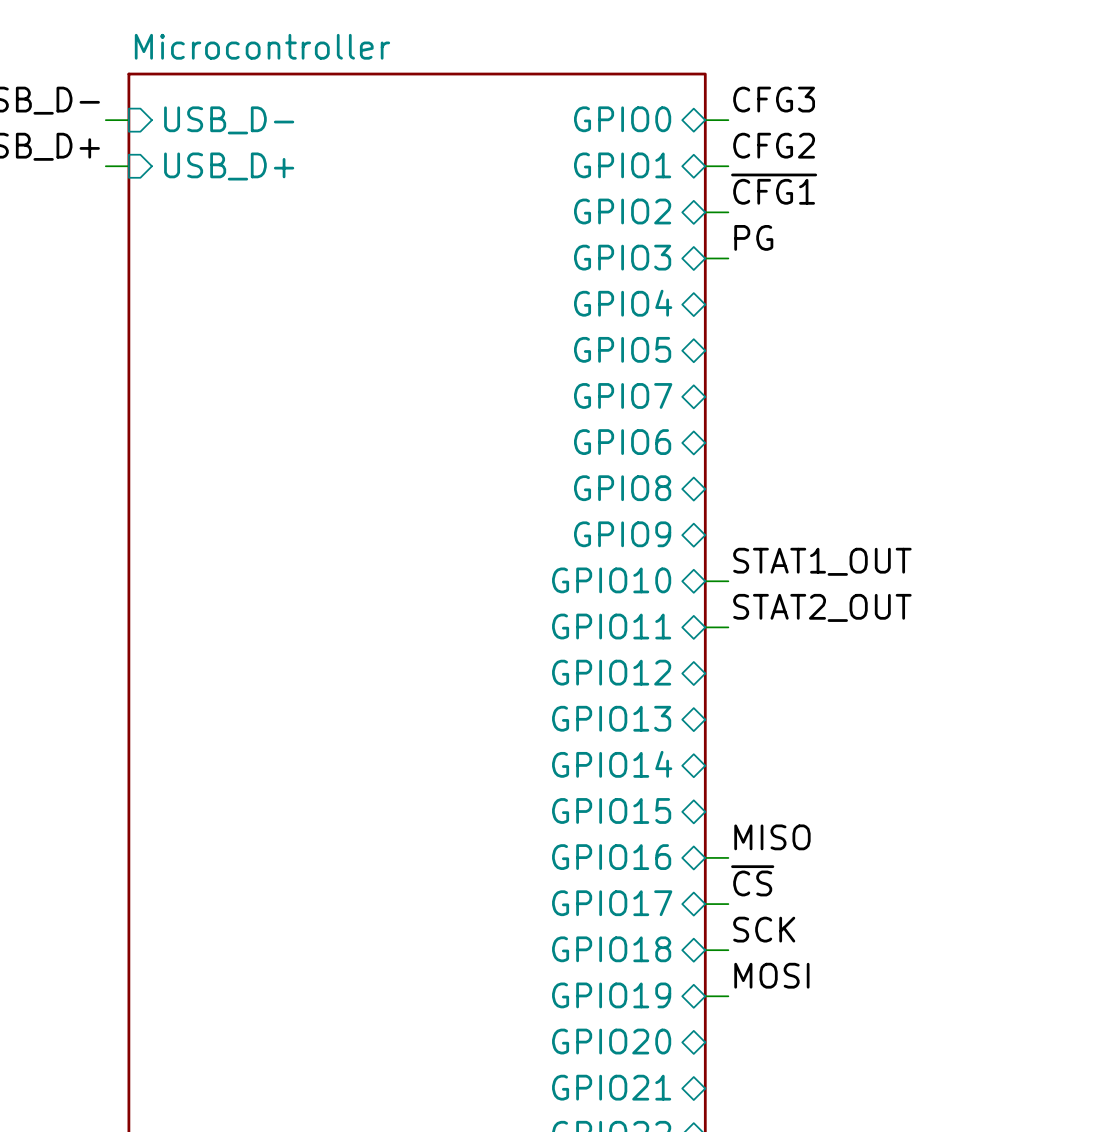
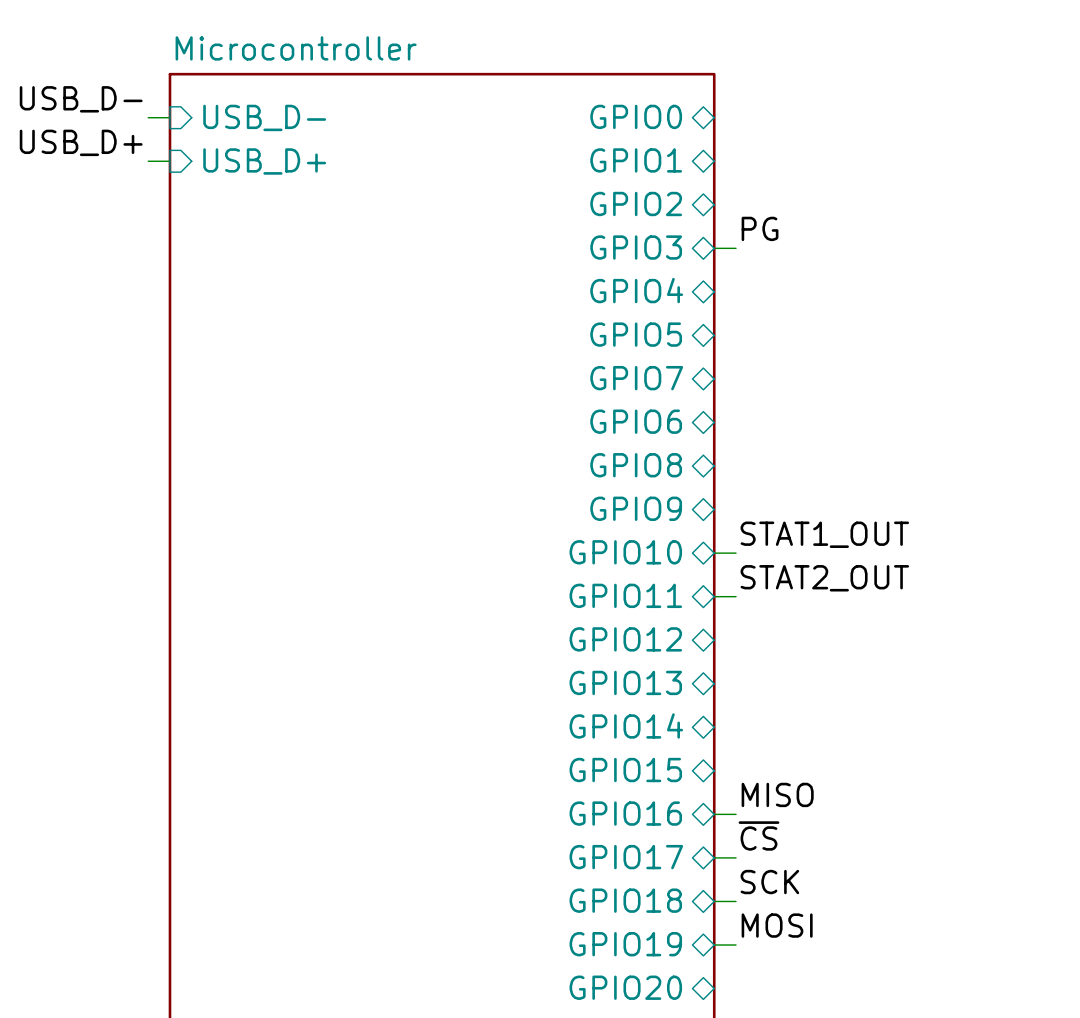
label: CFG3 (774, 99) -> none
wire: (705, 120) (728, 120) -> none
label: CFG2 (774, 145) -> none
wire: (705, 166) (728, 166) -> none
label: ~{CFG1} (774, 189) -> none
wire: (705, 212) (728, 212) -> none

